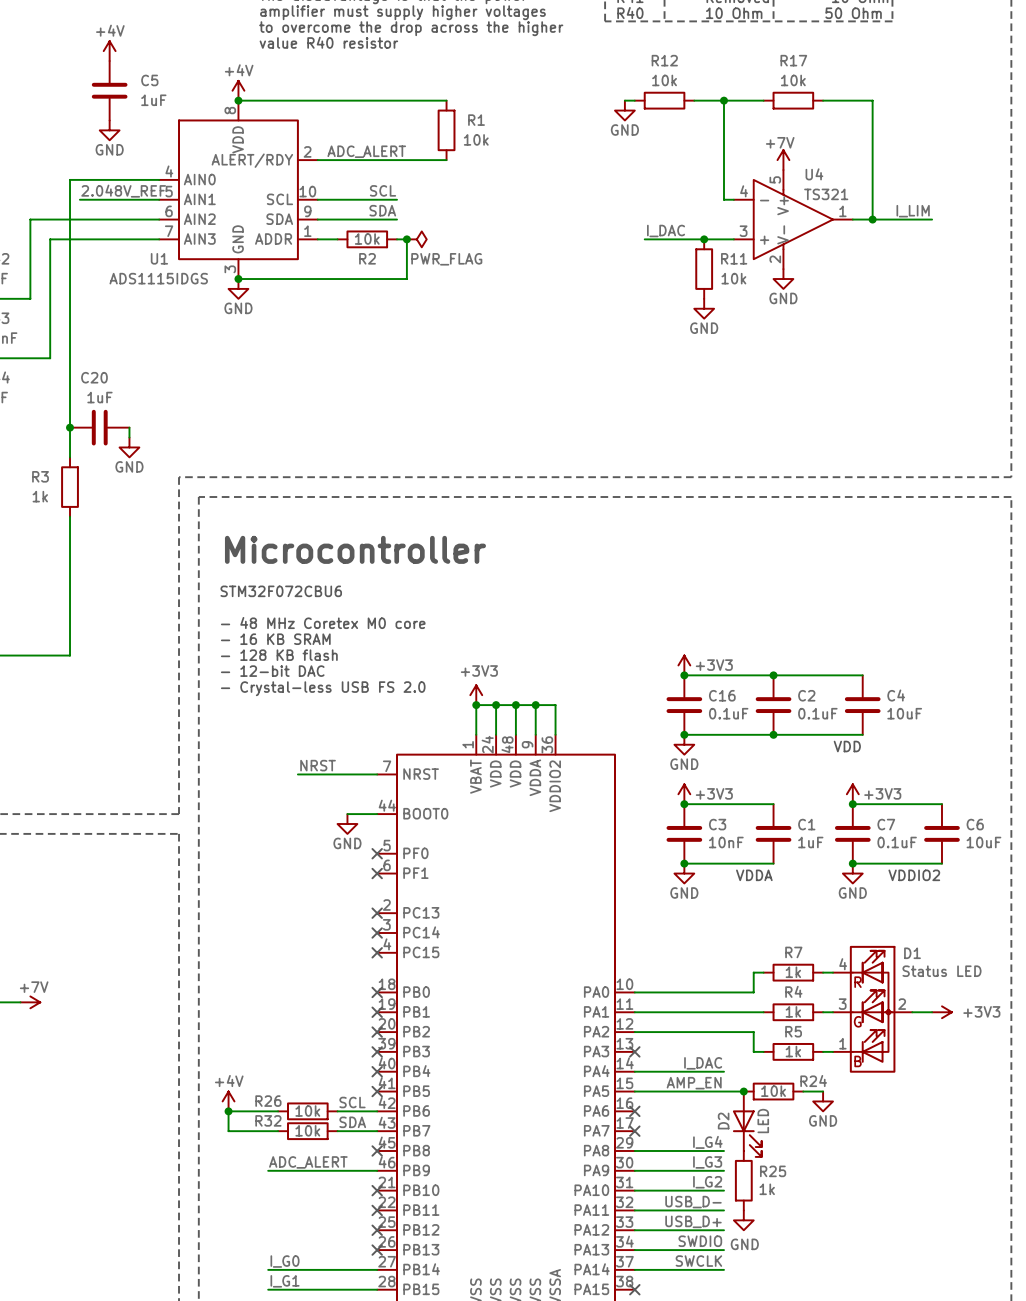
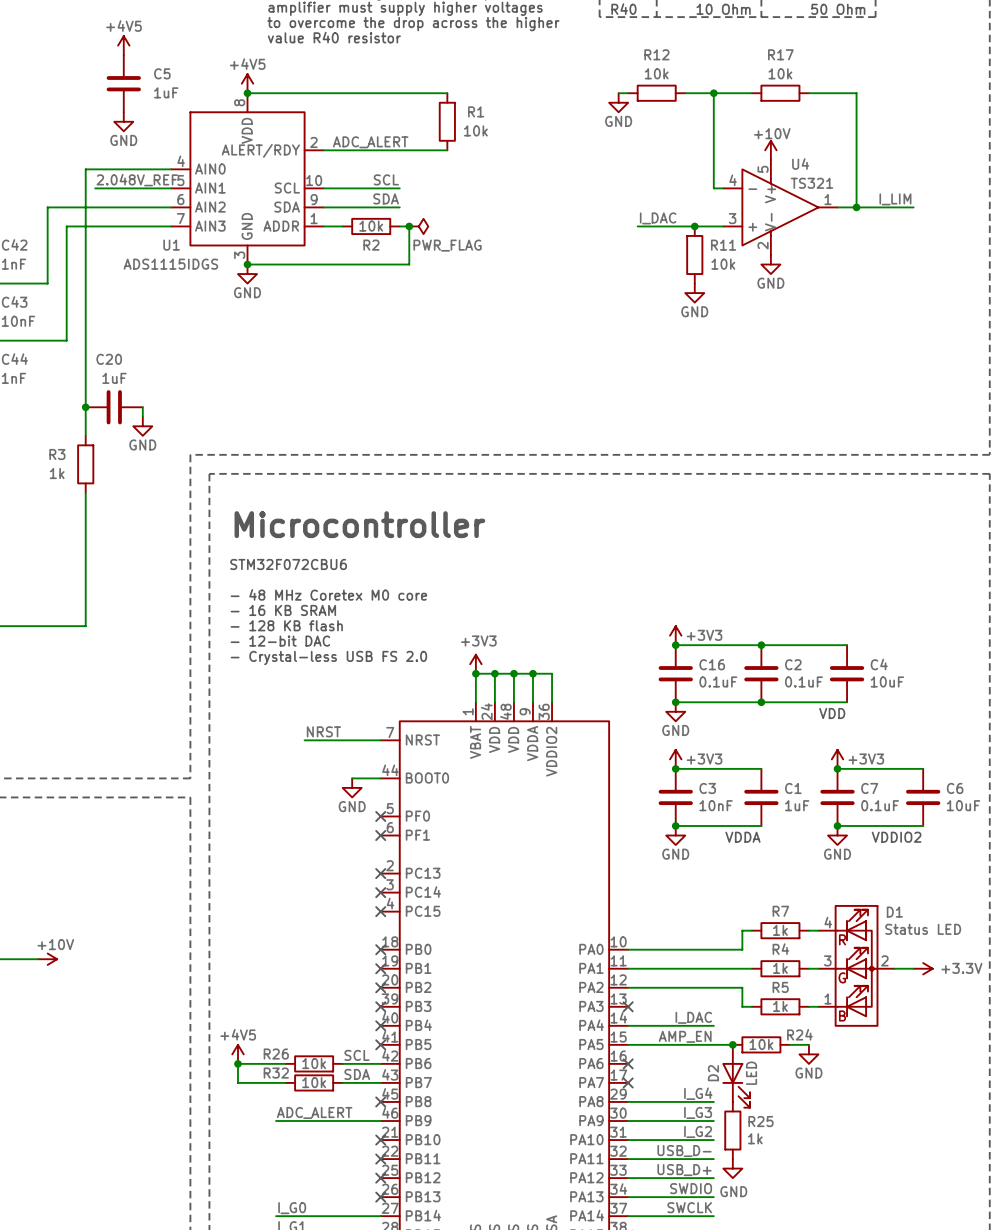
power symbol: +4V (109, 51) -> +4V5 (123, 45)
power symbol: +4V (238, 90) -> +4V5 (247, 83)
power symbol: +7V (783, 160) -> +10V (770, 150)
power symbol: +7V (30, 1002) -> +10V (47, 959)
power symbol: +3V3 (941, 1012) -> +3.3V (923, 968)
power symbol: +4V (228, 1101) -> +4V5 (237, 1054)

